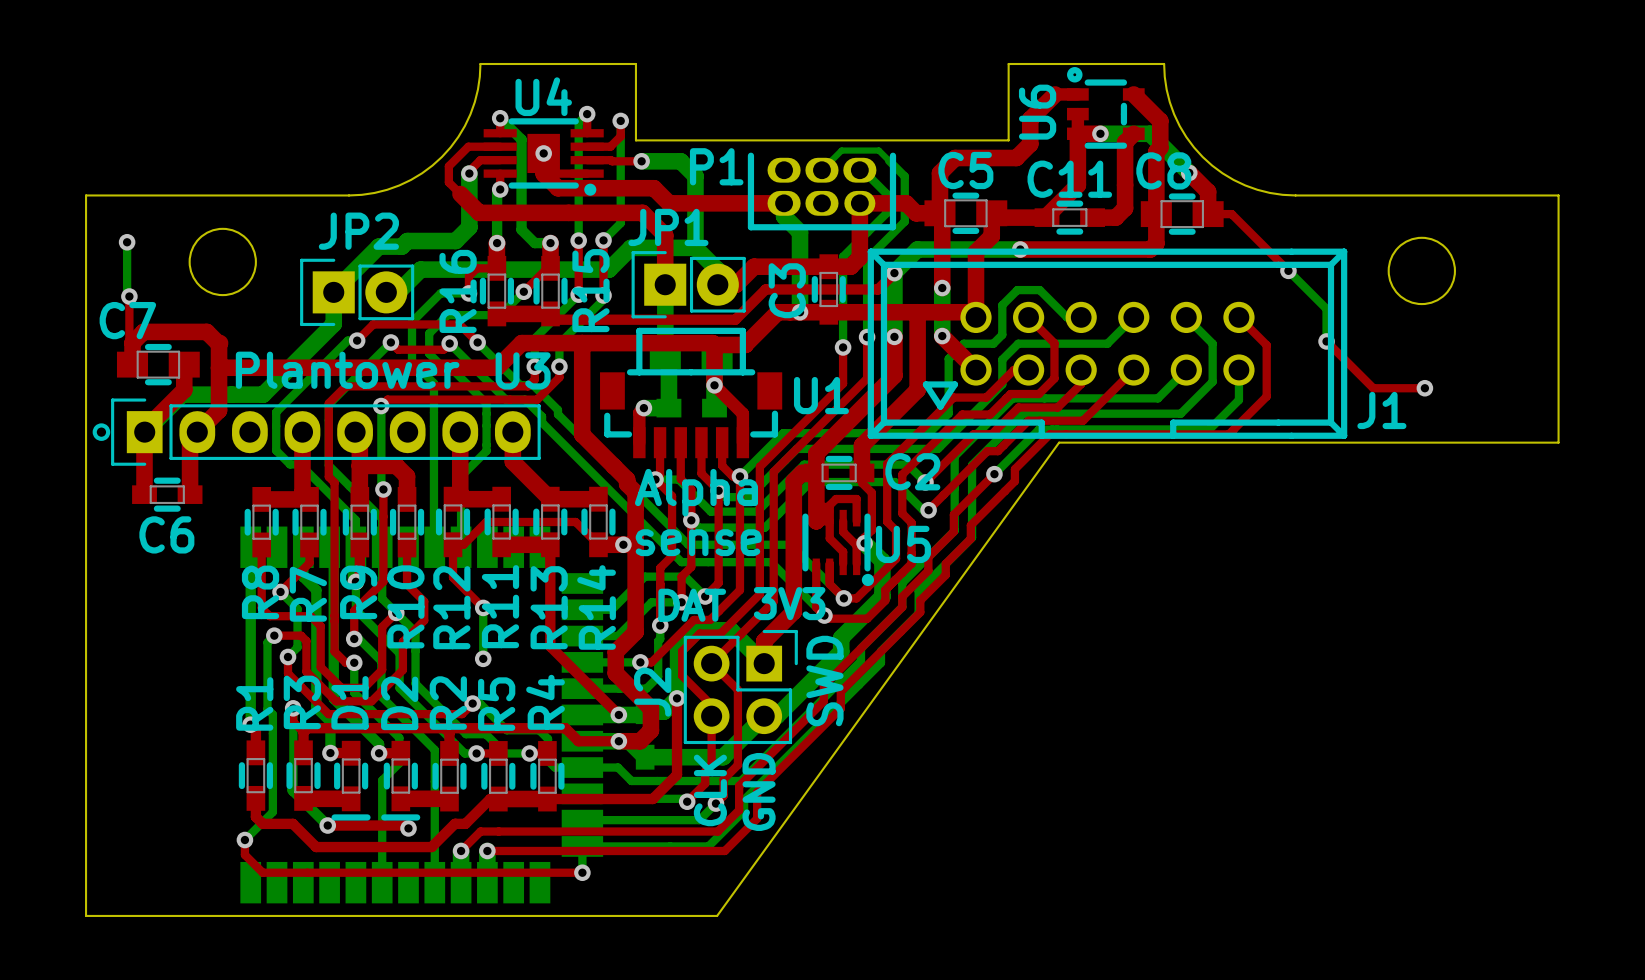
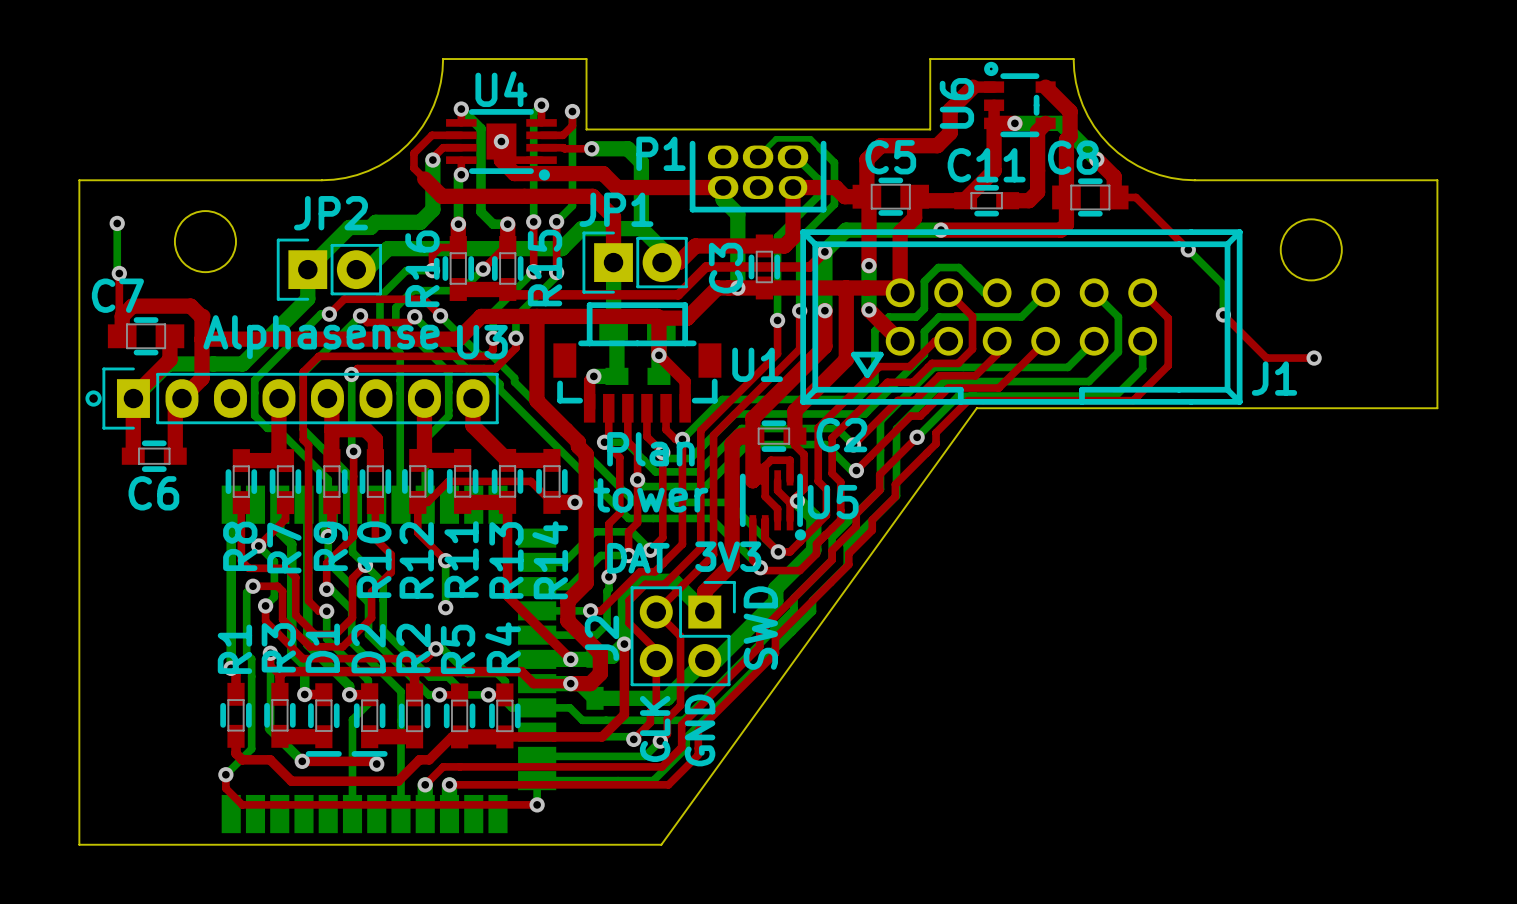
text: Plantower (347, 370) -> Alphasense (321, 337)
text: Alpha (696, 492) -> Plan (650, 449)
text: sense (698, 542) -> tower (650, 495)

